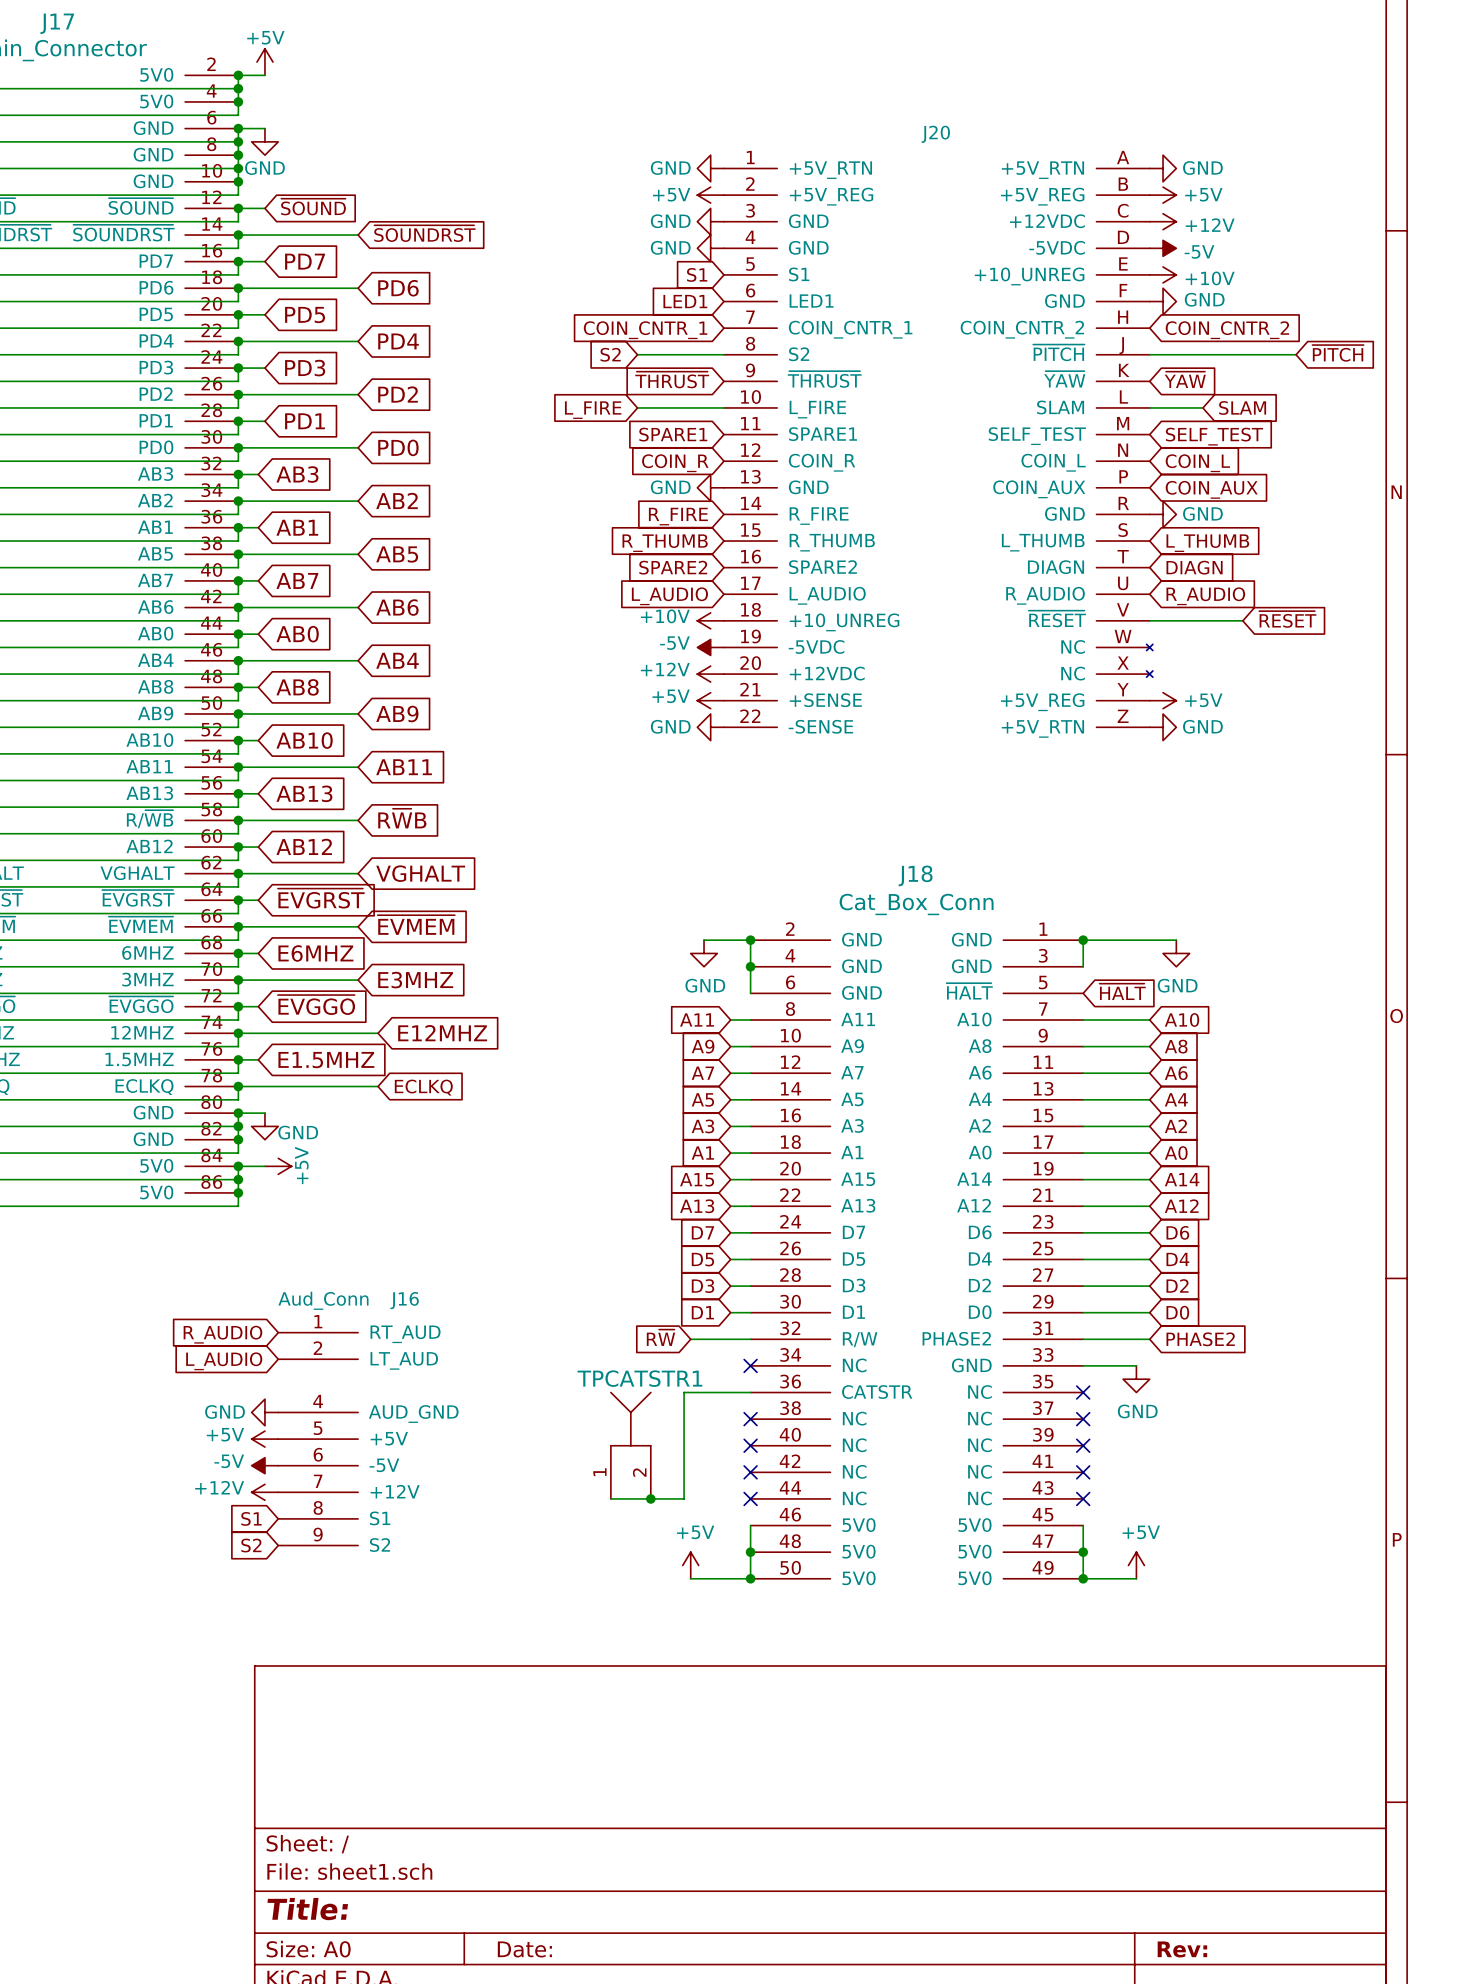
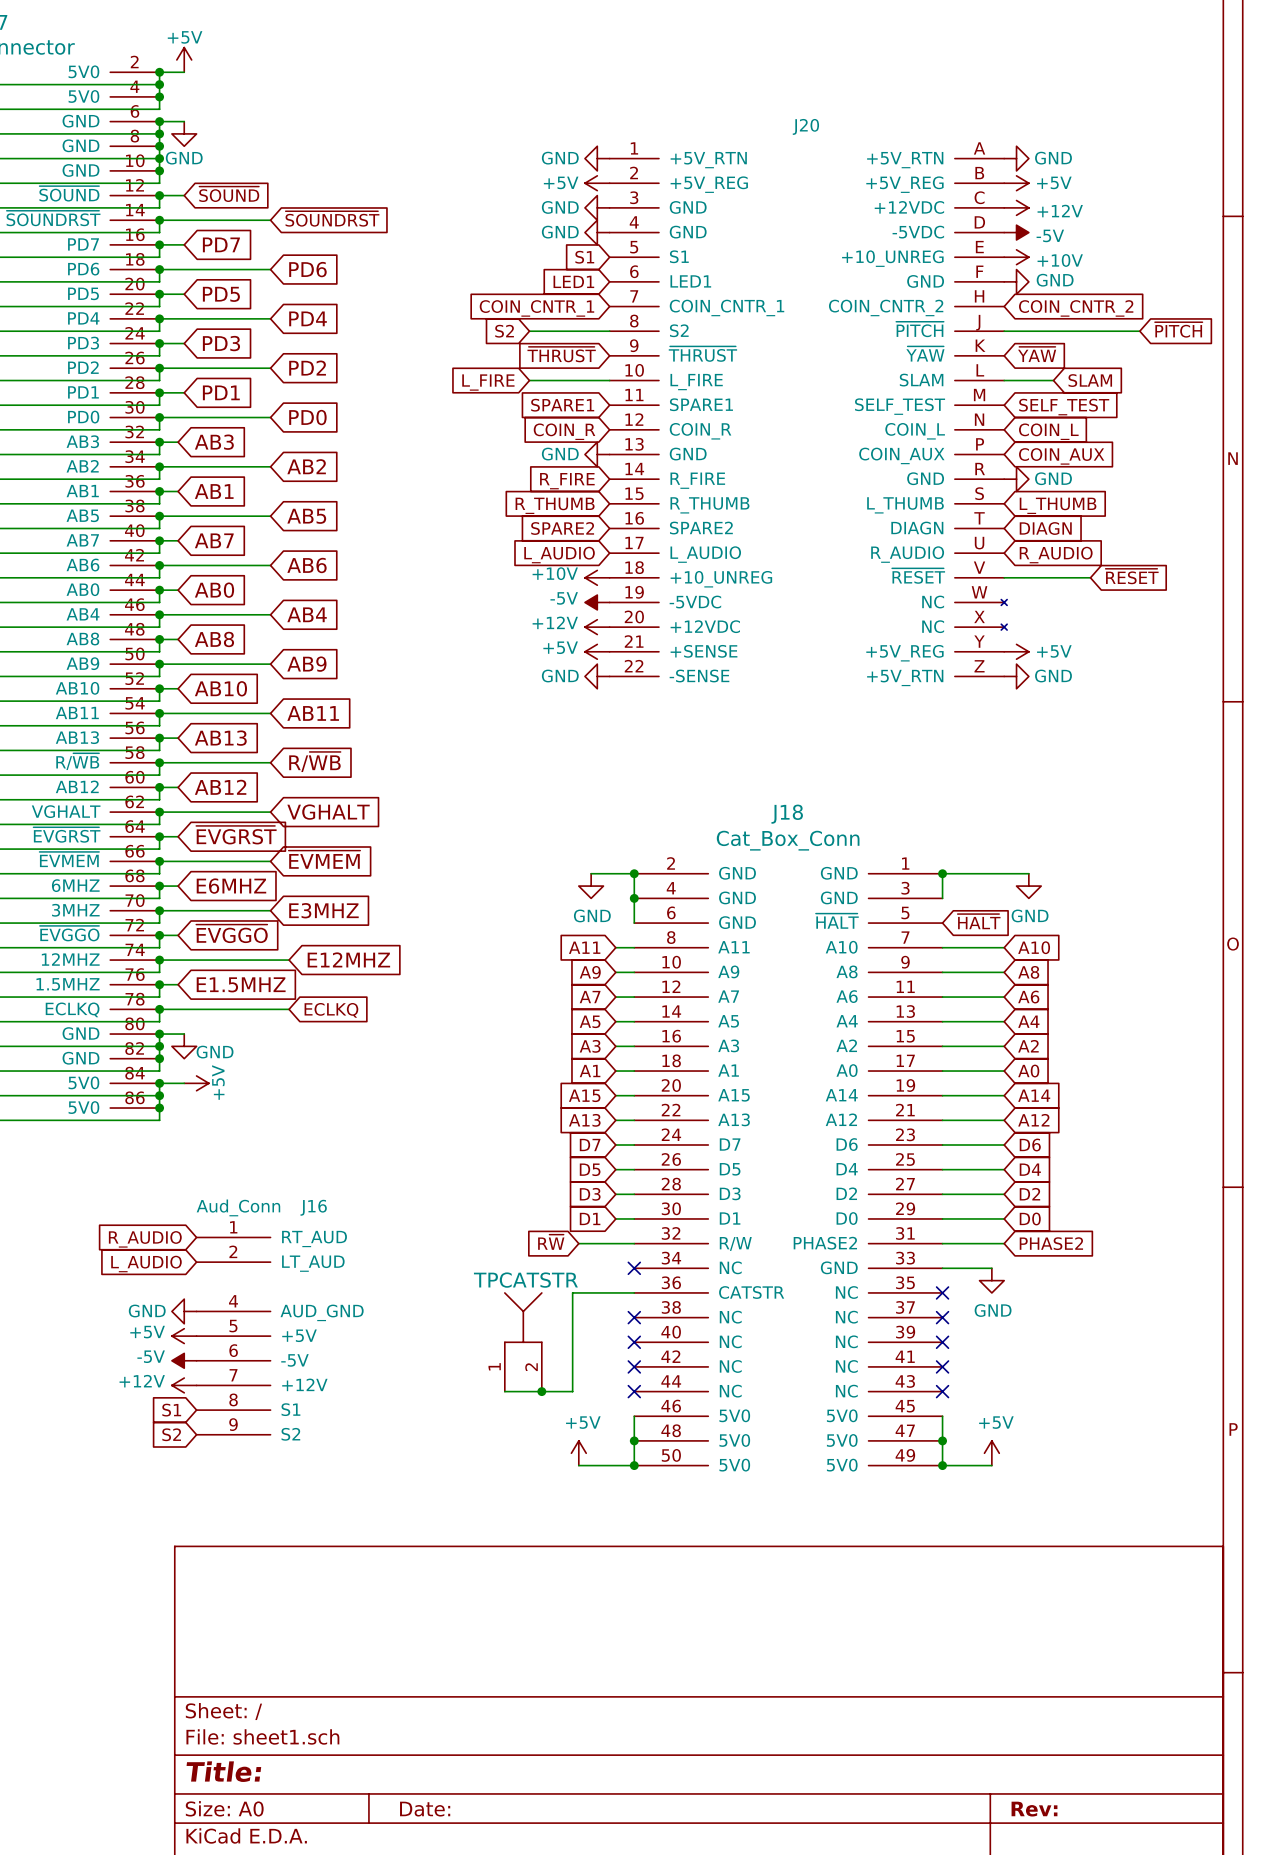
global label: R~{W}B (402, 818) -> R/~{WB} (314, 762)
TPCATSTR1 name: TPCATSTR1 (639, 1378) -> TPCATSTR (525, 1280)

